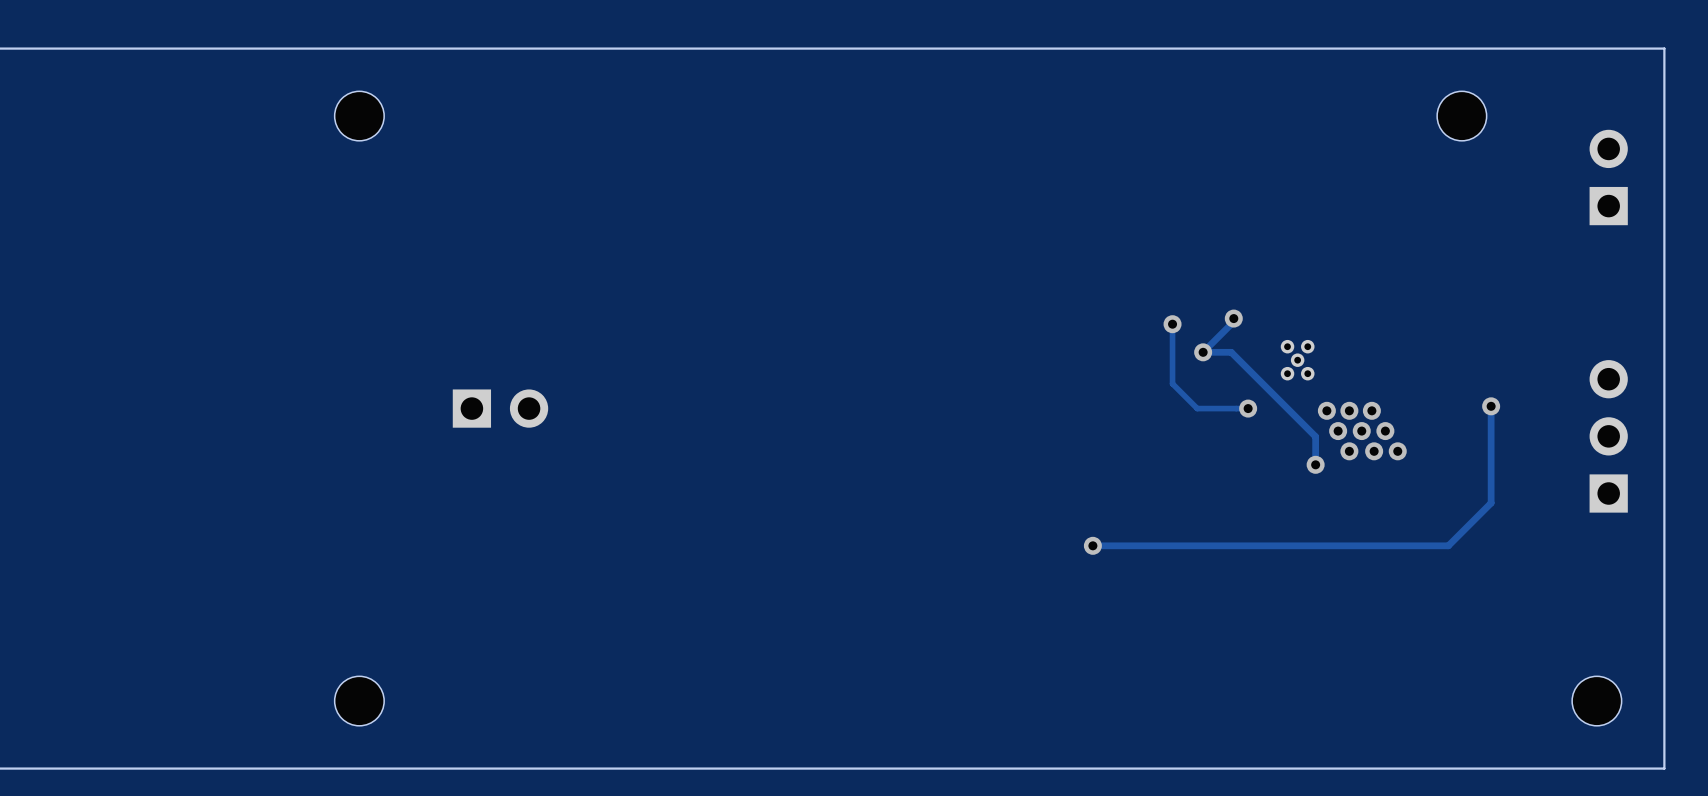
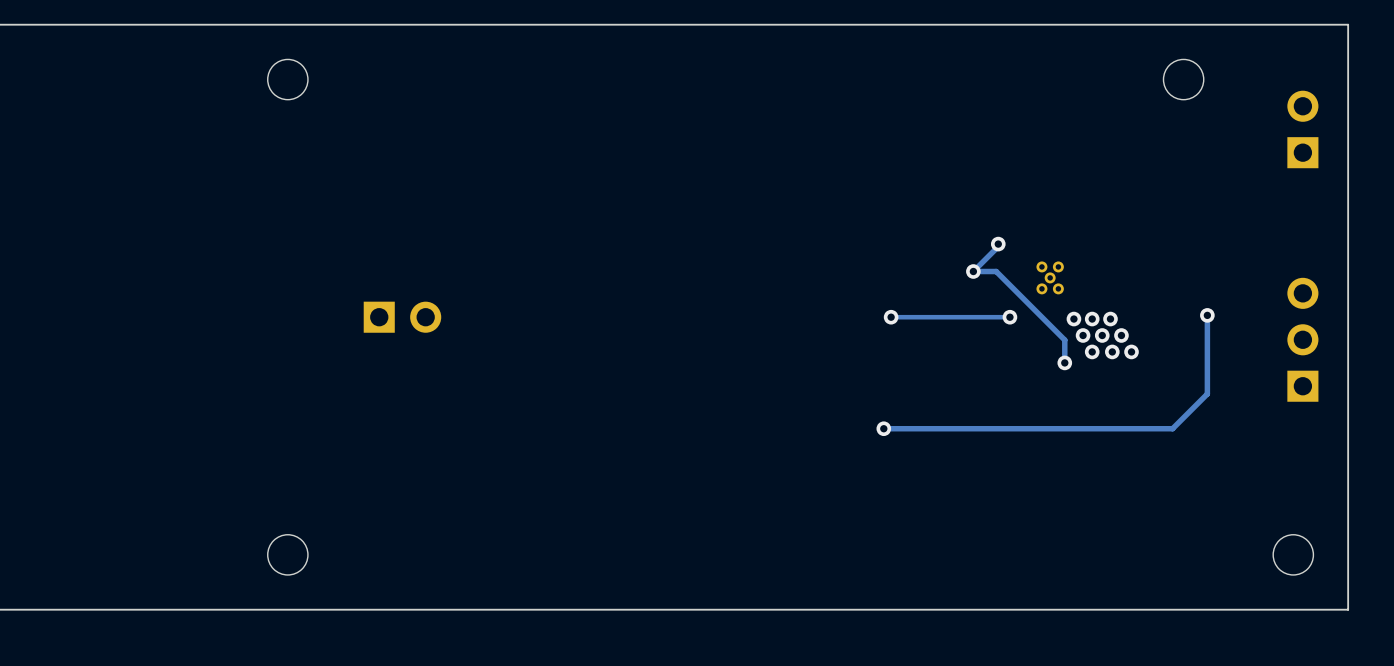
track: (1172, 324) (1172, 383) (1197, 408) -> (891, 317) (968, 317)
via position: (1172, 324) -> (891, 317)

